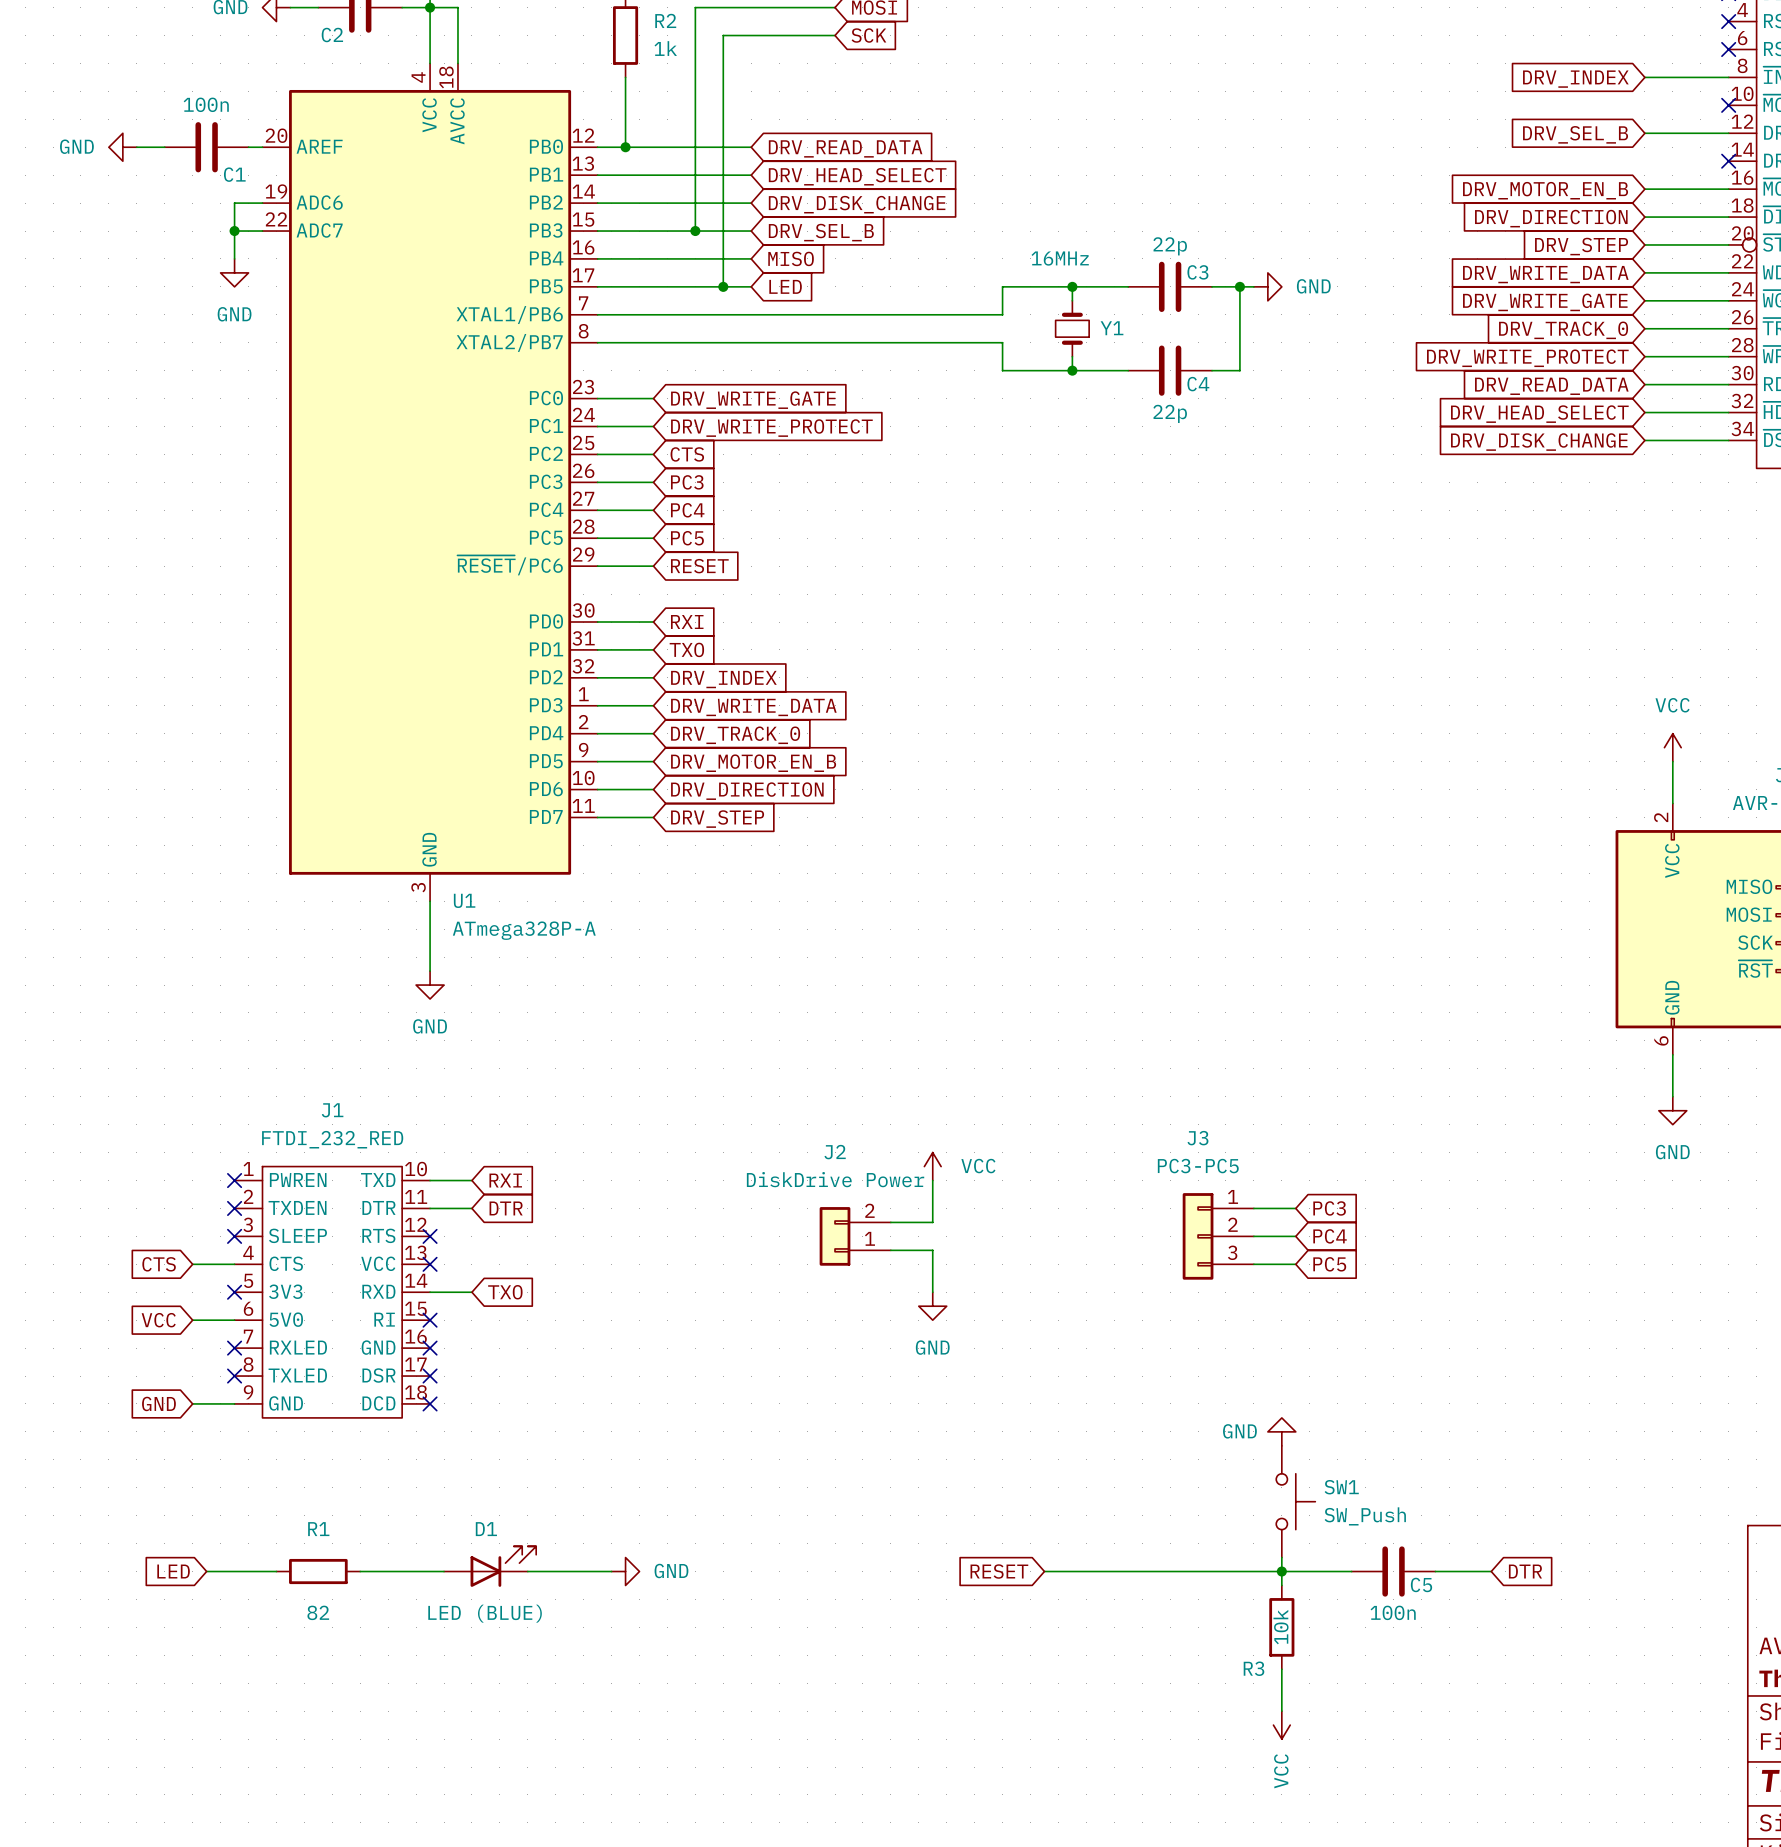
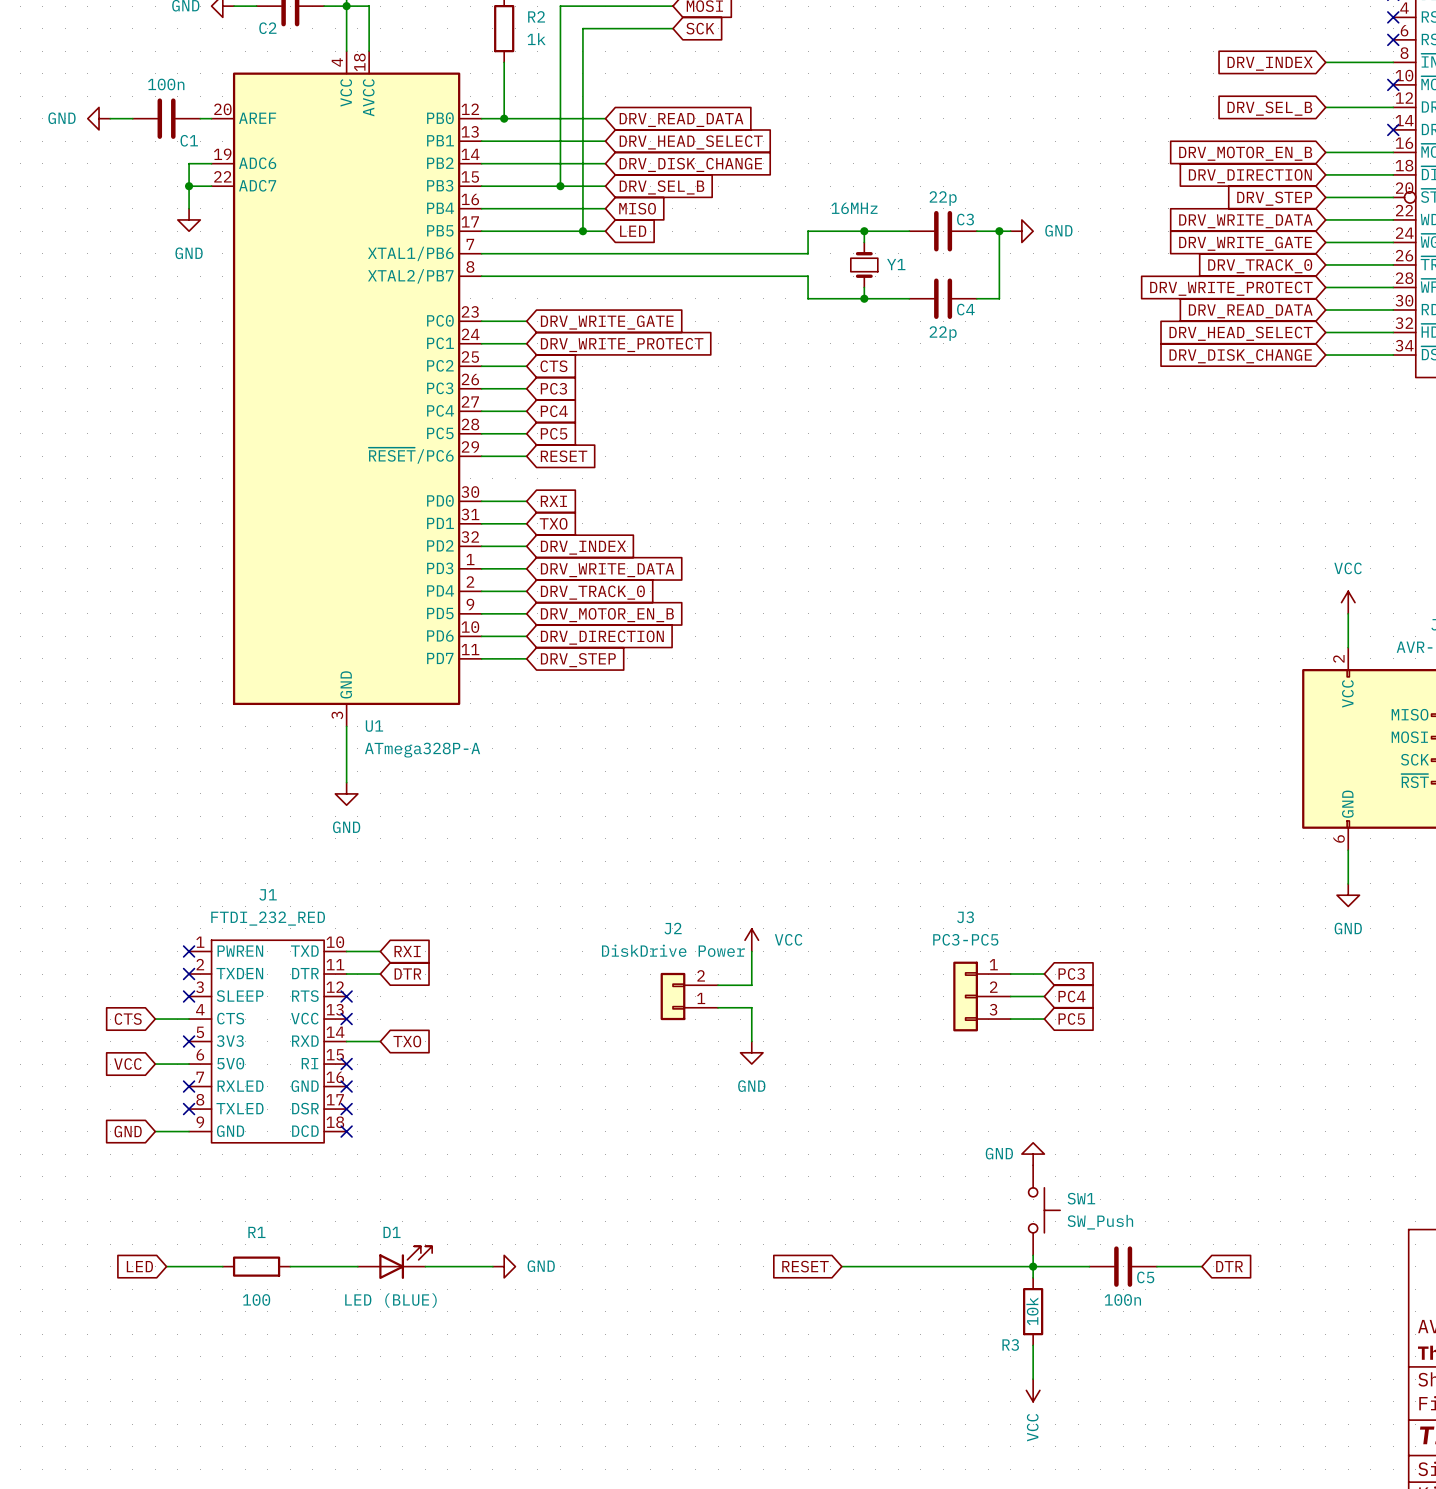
R1 value: 82 (318, 1612) -> 100 (256, 1299)

